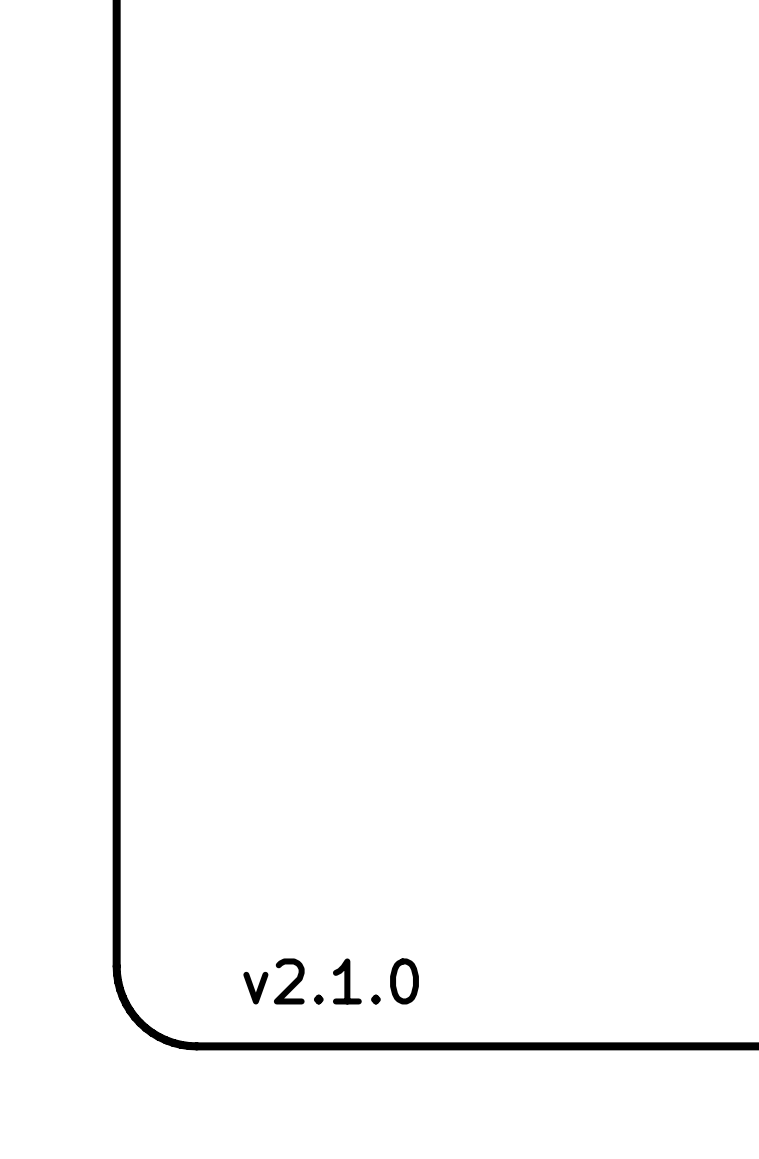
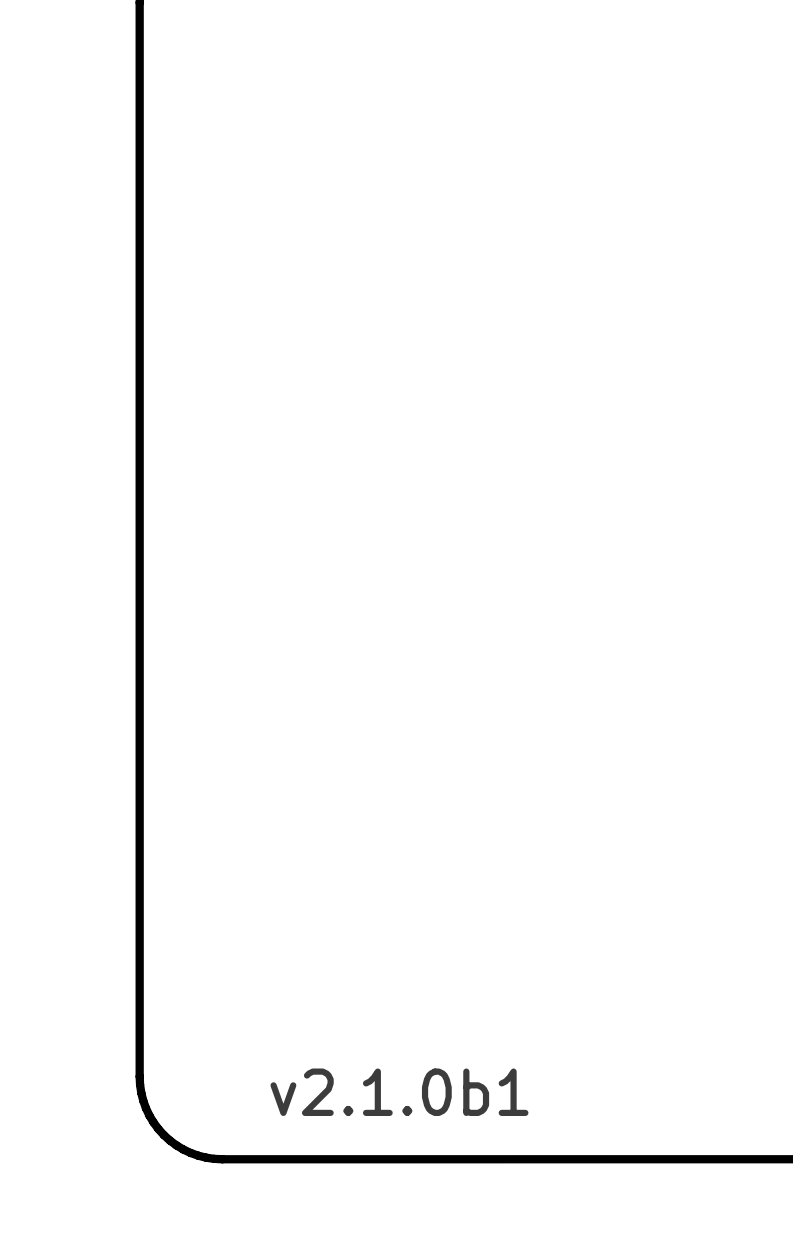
text: v2.1.0 (331, 981) -> v2.1.0b1 (399, 1092)

